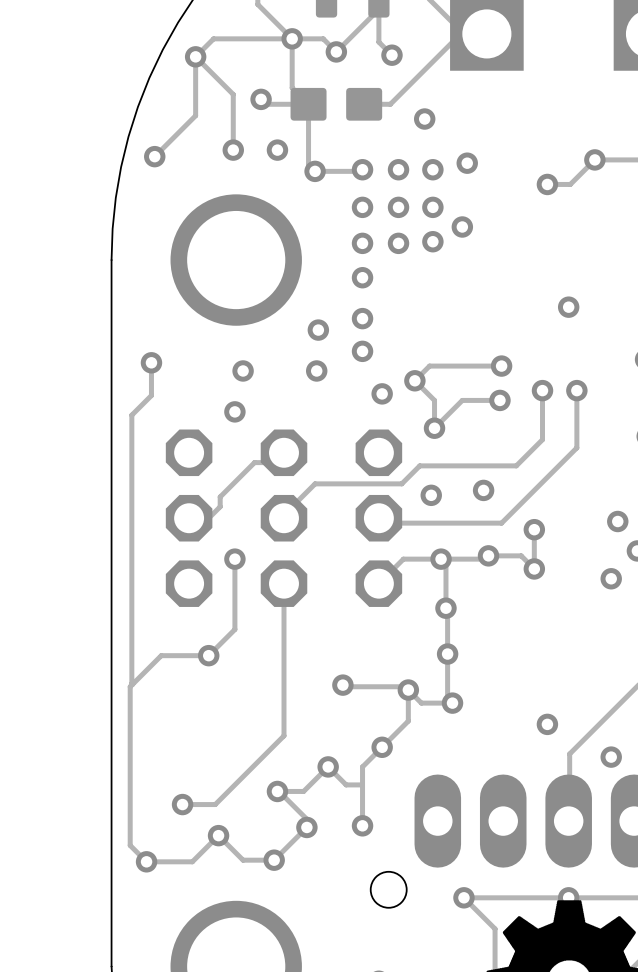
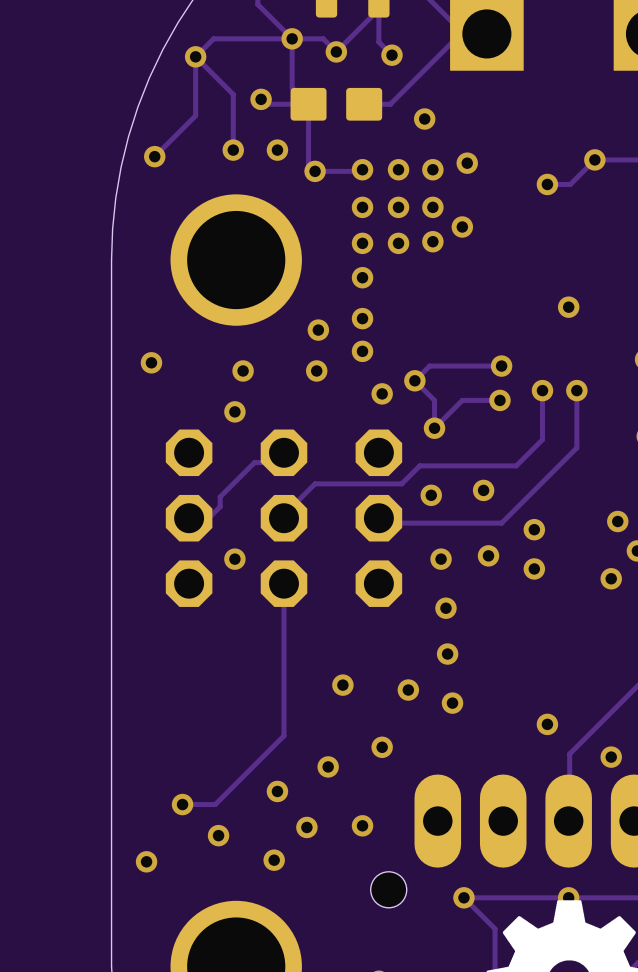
track: (151, 362) (151, 395) (131, 415) (132, 684) -> none
track: (534, 529) (534, 568) (521, 555) (488, 555) (485, 559) (403, 559) (378, 583) -> none
track: (234, 559) (234, 629) (208, 655) (161, 655) (130, 686) (130, 845) (146, 861) (192, 861) (218, 835) (243, 860) (274, 860) (306, 827) (306, 819) (279, 791) -> none
track: (441, 559) (445, 564) (447, 698) (452, 703) (421, 703) (405, 686) (344, 686) (342, 685) -> none
via: (208, 655) -> none
track: (408, 690) (408, 721) (362, 766) (362, 825) -> none
track: (362, 784) (346, 784) (328, 766) (303, 791) (277, 791) -> none

